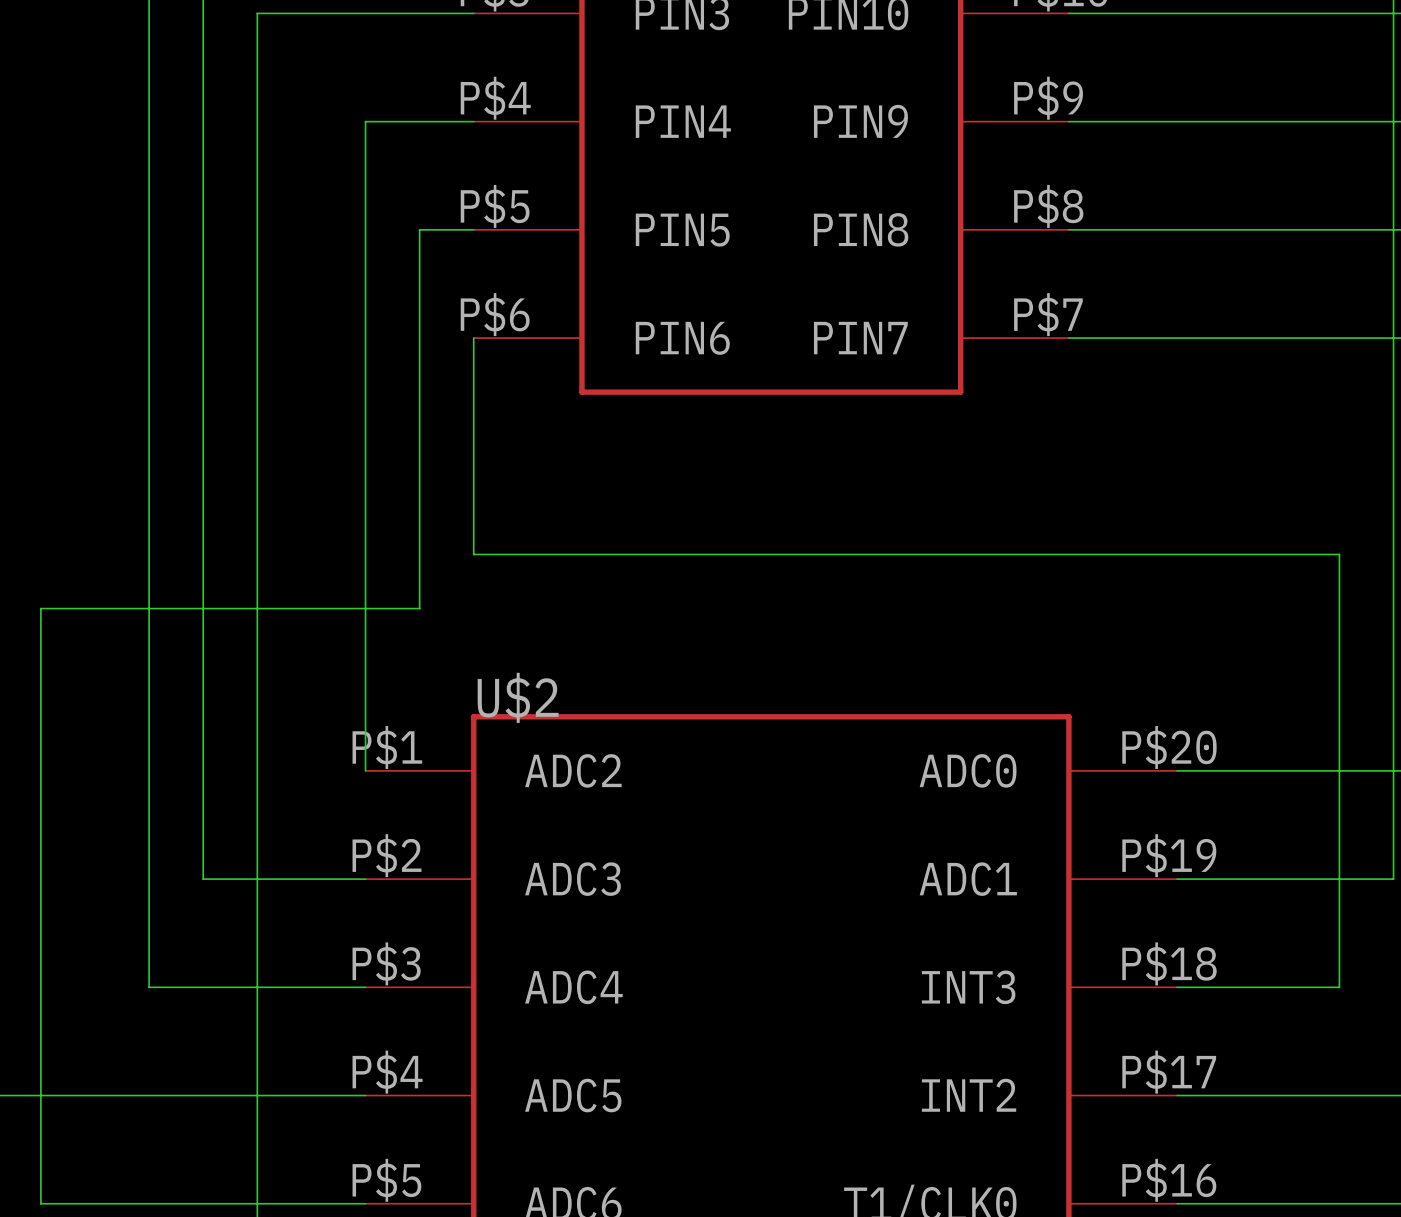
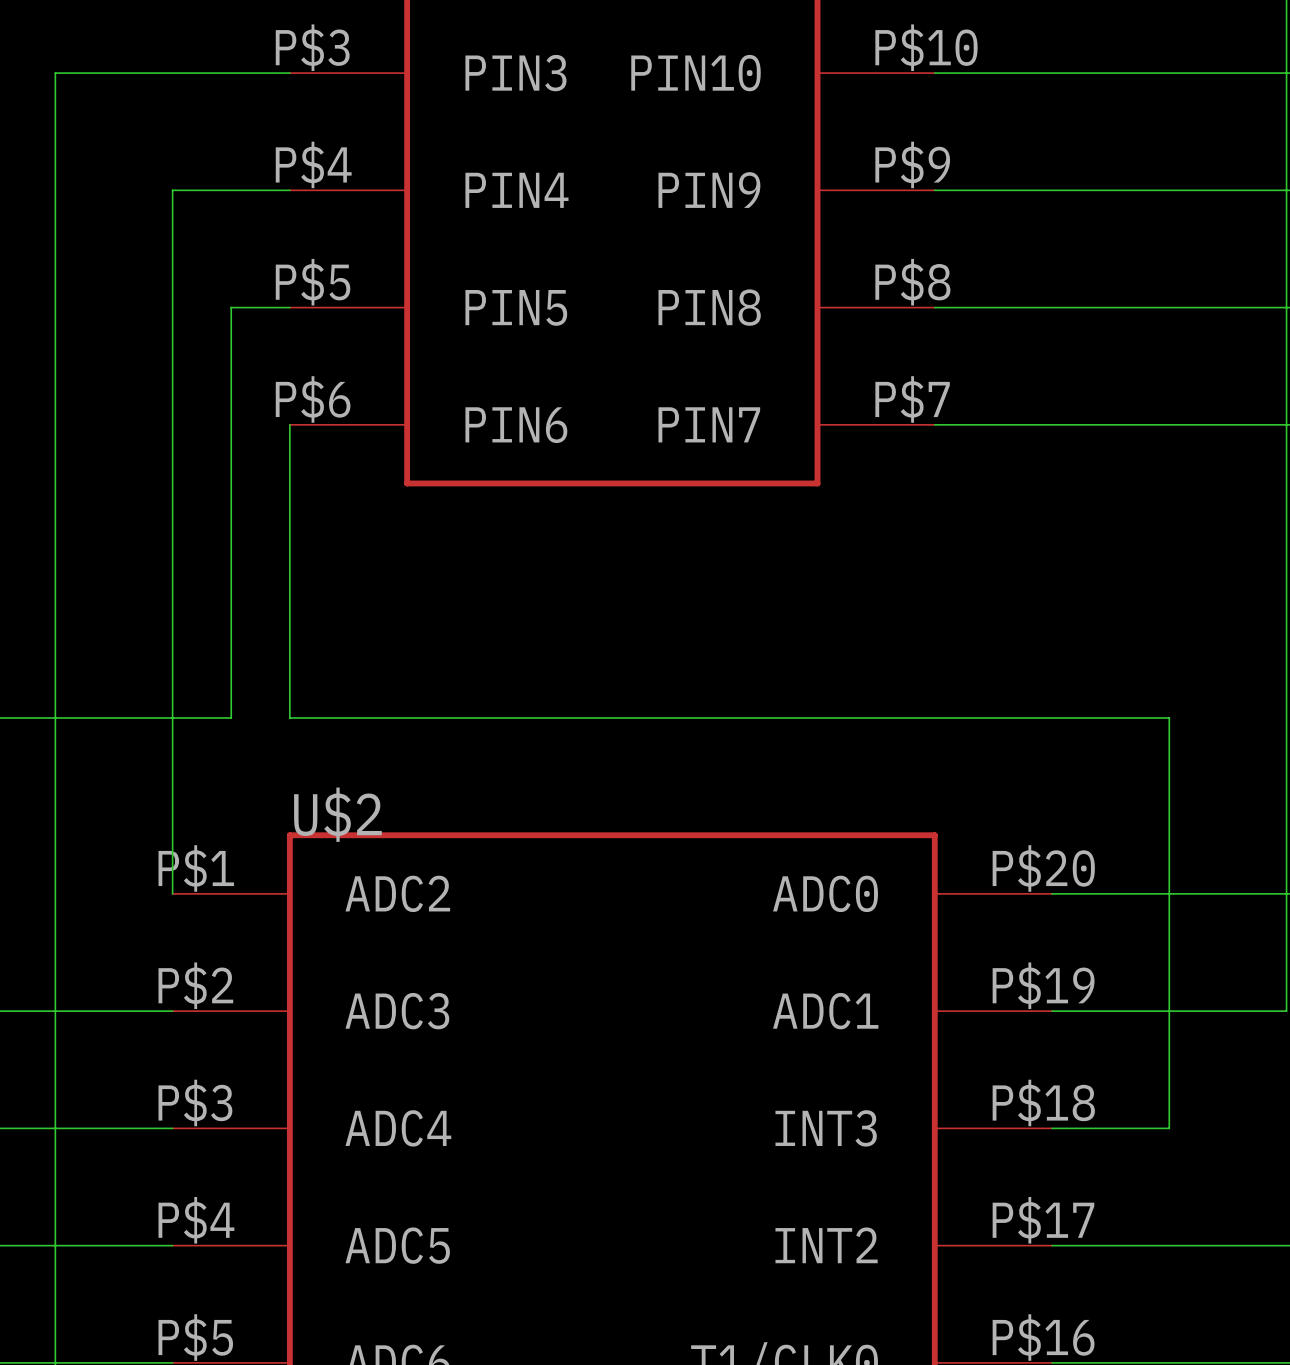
wire: (473, 554) (1339, 554) (1339, 987) (1285, 987) -> (289, 659) (289, 717) (1169, 717) (1169, 1128)

